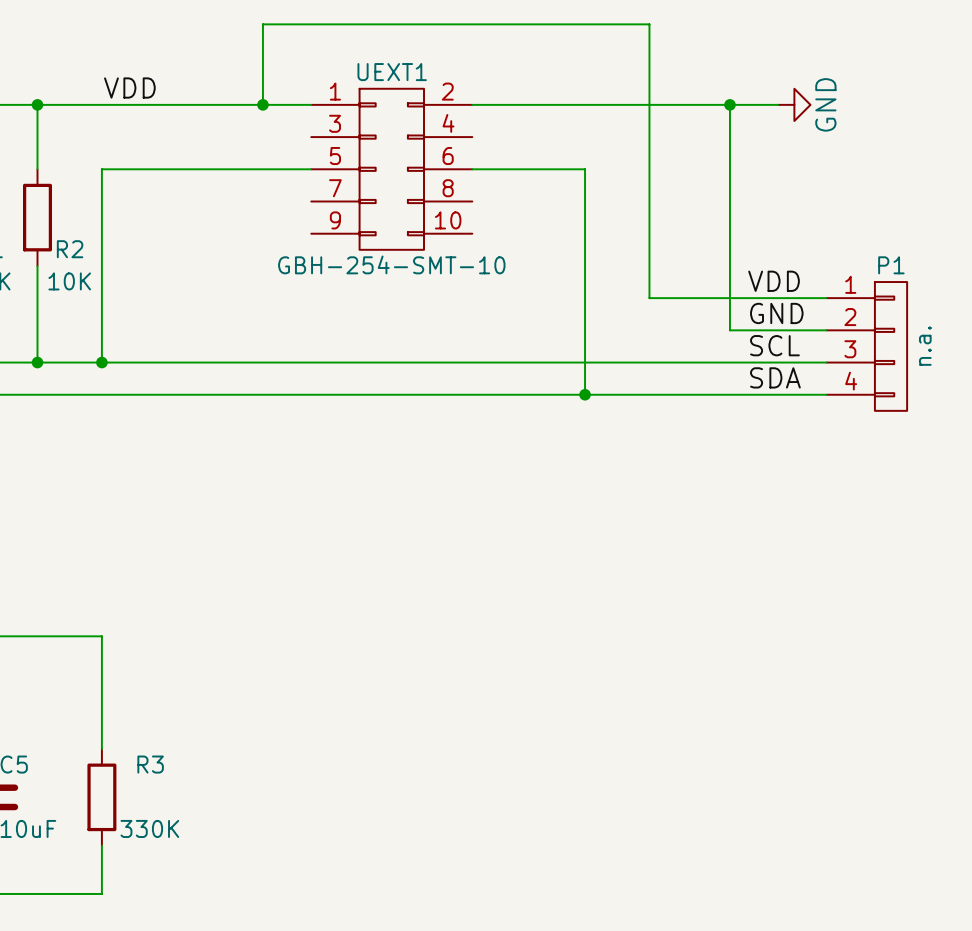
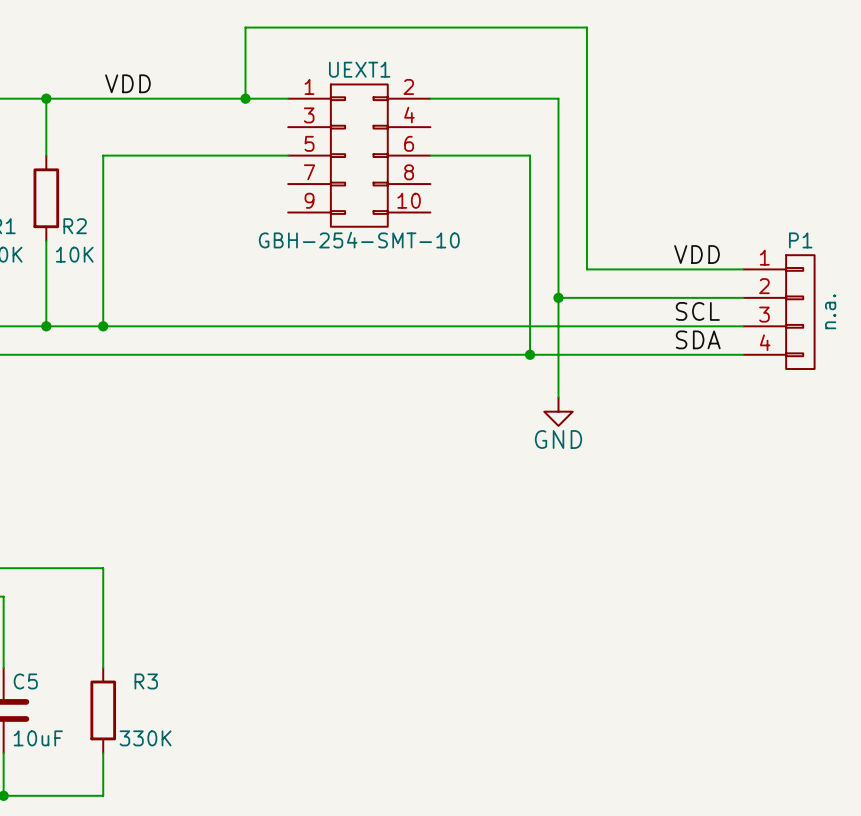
wire: (617, 104) (778, 104) -> (558, 98) (558, 397)
wire: (729, 104) (729, 330) -> (558, 297) (658, 297)
junction: (729, 104) -> none
power symbol: GND (794, 104) -> none
label: GND (776, 313) -> none
junction: none -> (558, 297)
power symbol: none -> GND (558, 411)

